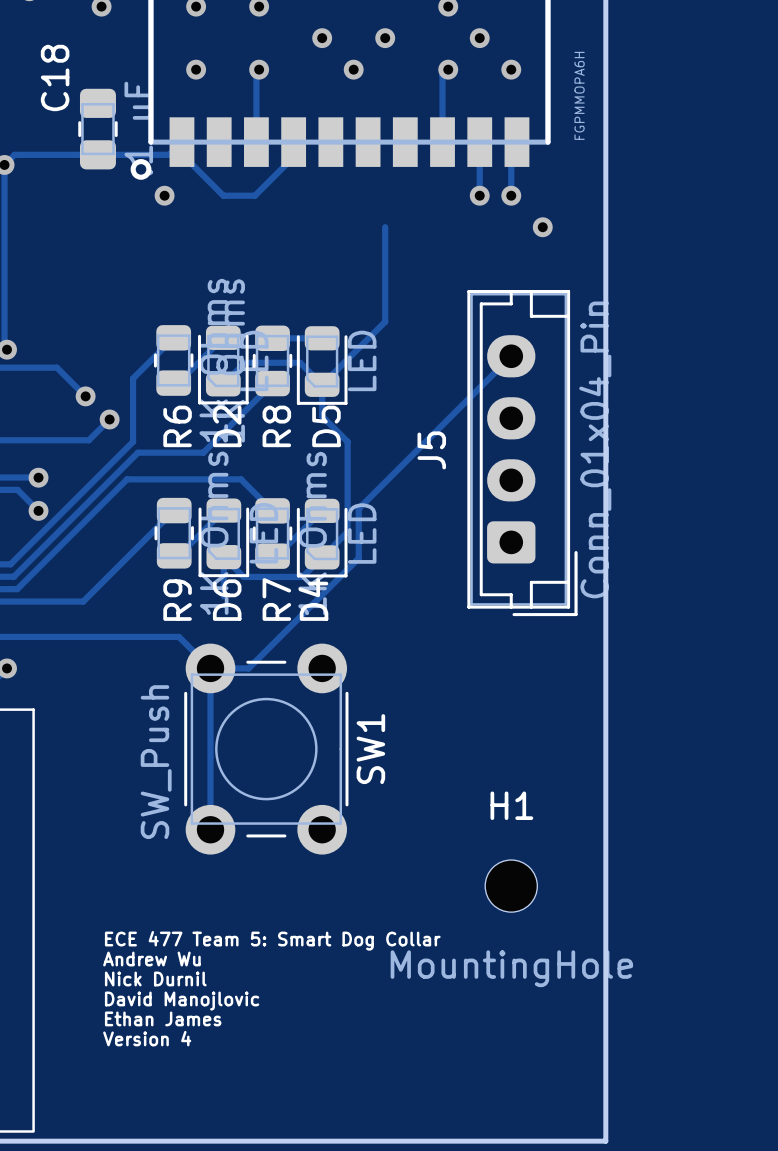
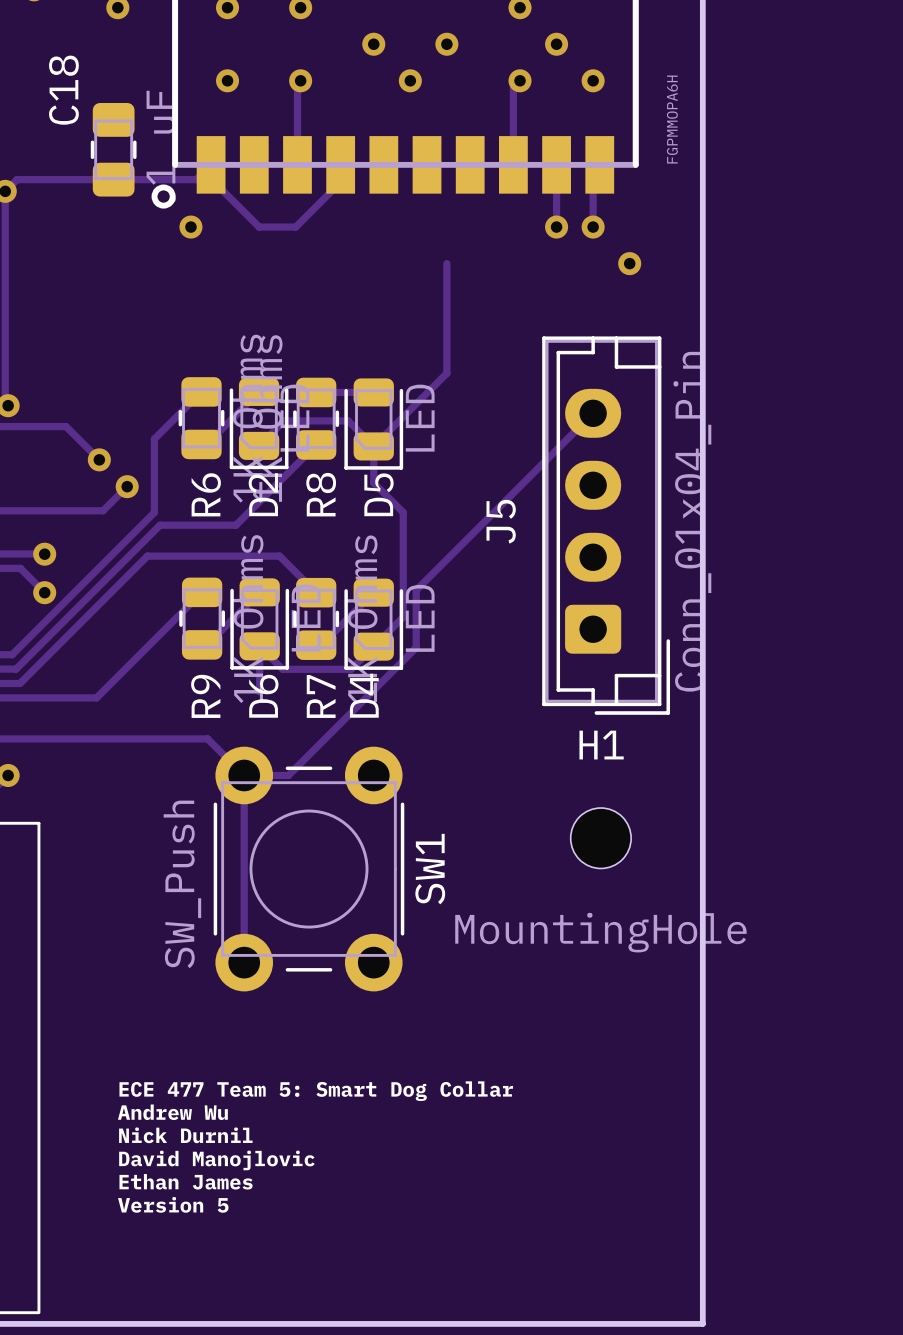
H1 position: (511, 886) -> (600, 838)
text: Version 4 (147, 1038) -> Version 5 (173, 1204)

